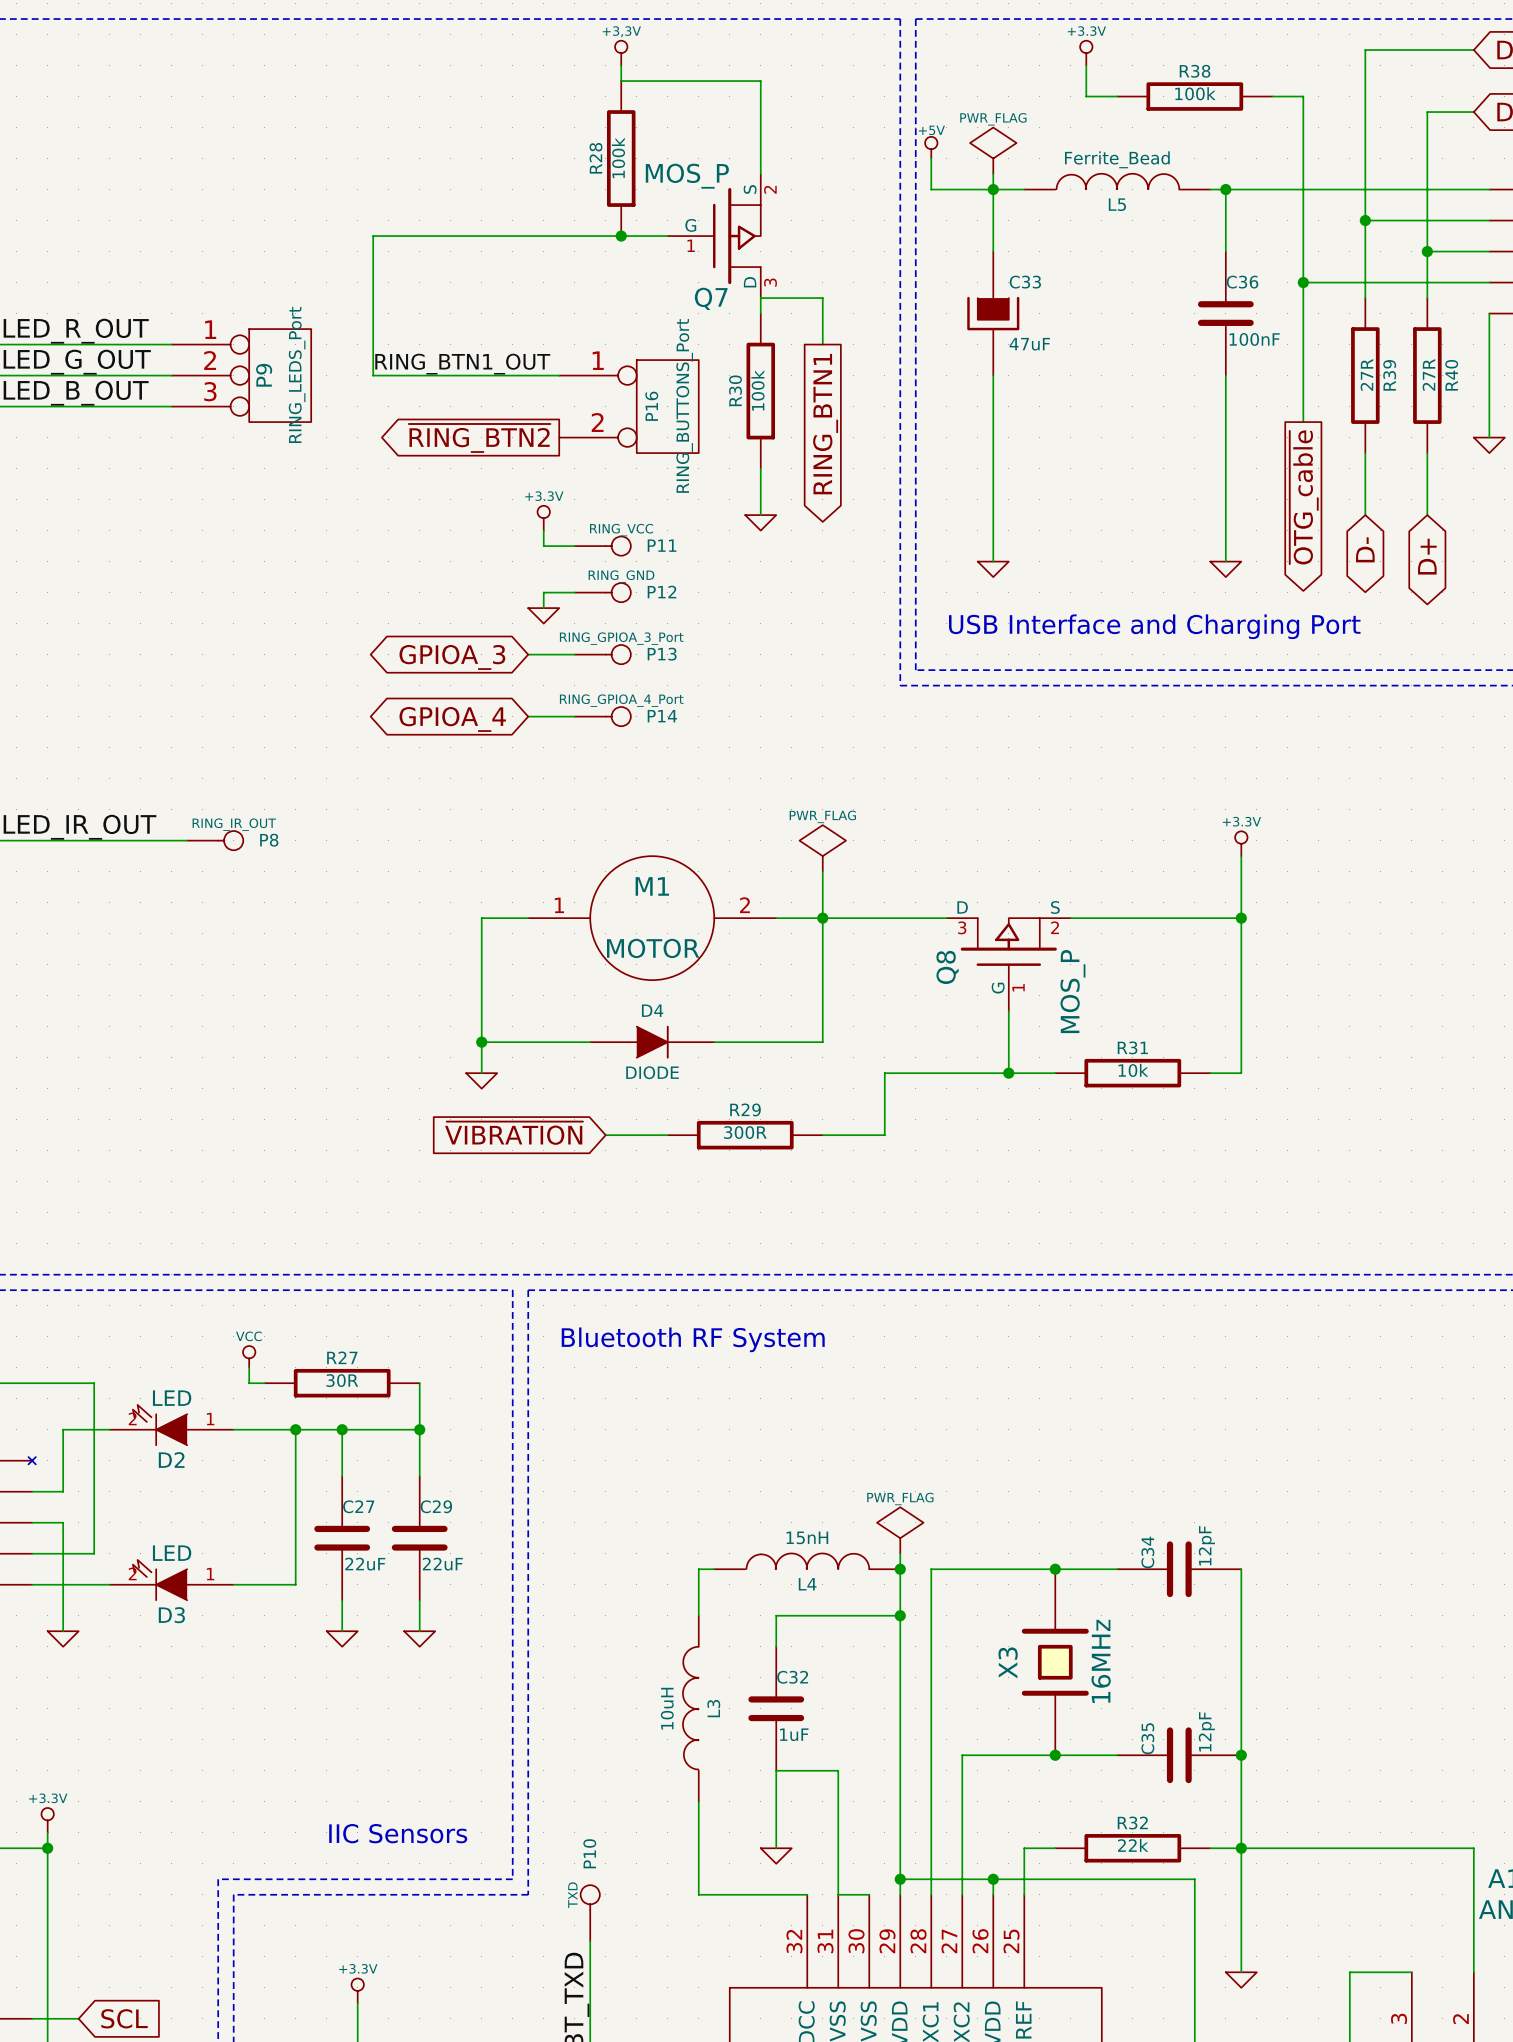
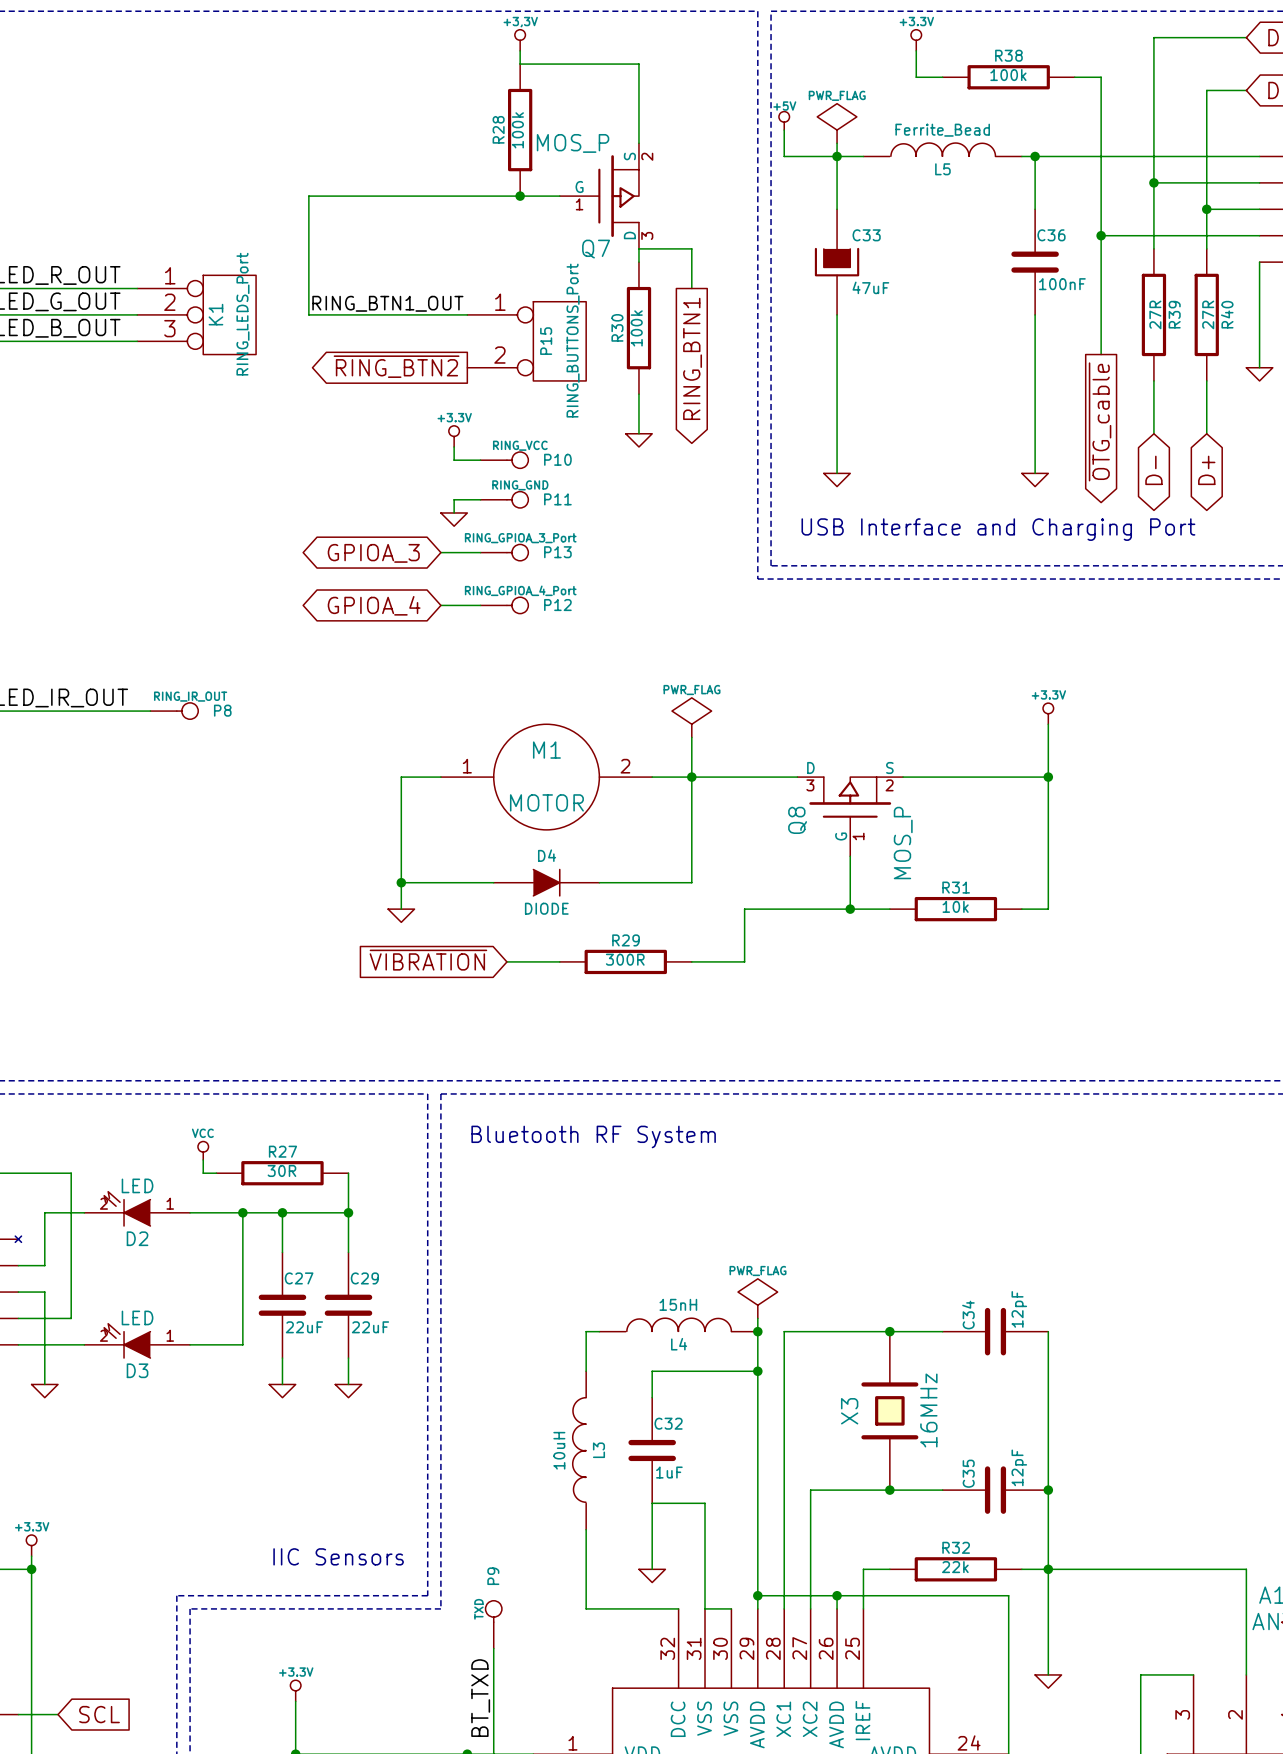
P9 name: P9 (264, 375) -> K1 (215, 314)
P16 name: P16 (651, 406) -> P15 (546, 341)
P11 name: P11 (662, 545) -> P10 (557, 459)
P12 name: P12 (661, 592) -> P11 (557, 499)
P14 name: P14 (662, 716) -> P12 (557, 605)
P10 name: P10 (589, 1853) -> P9 (493, 1576)

